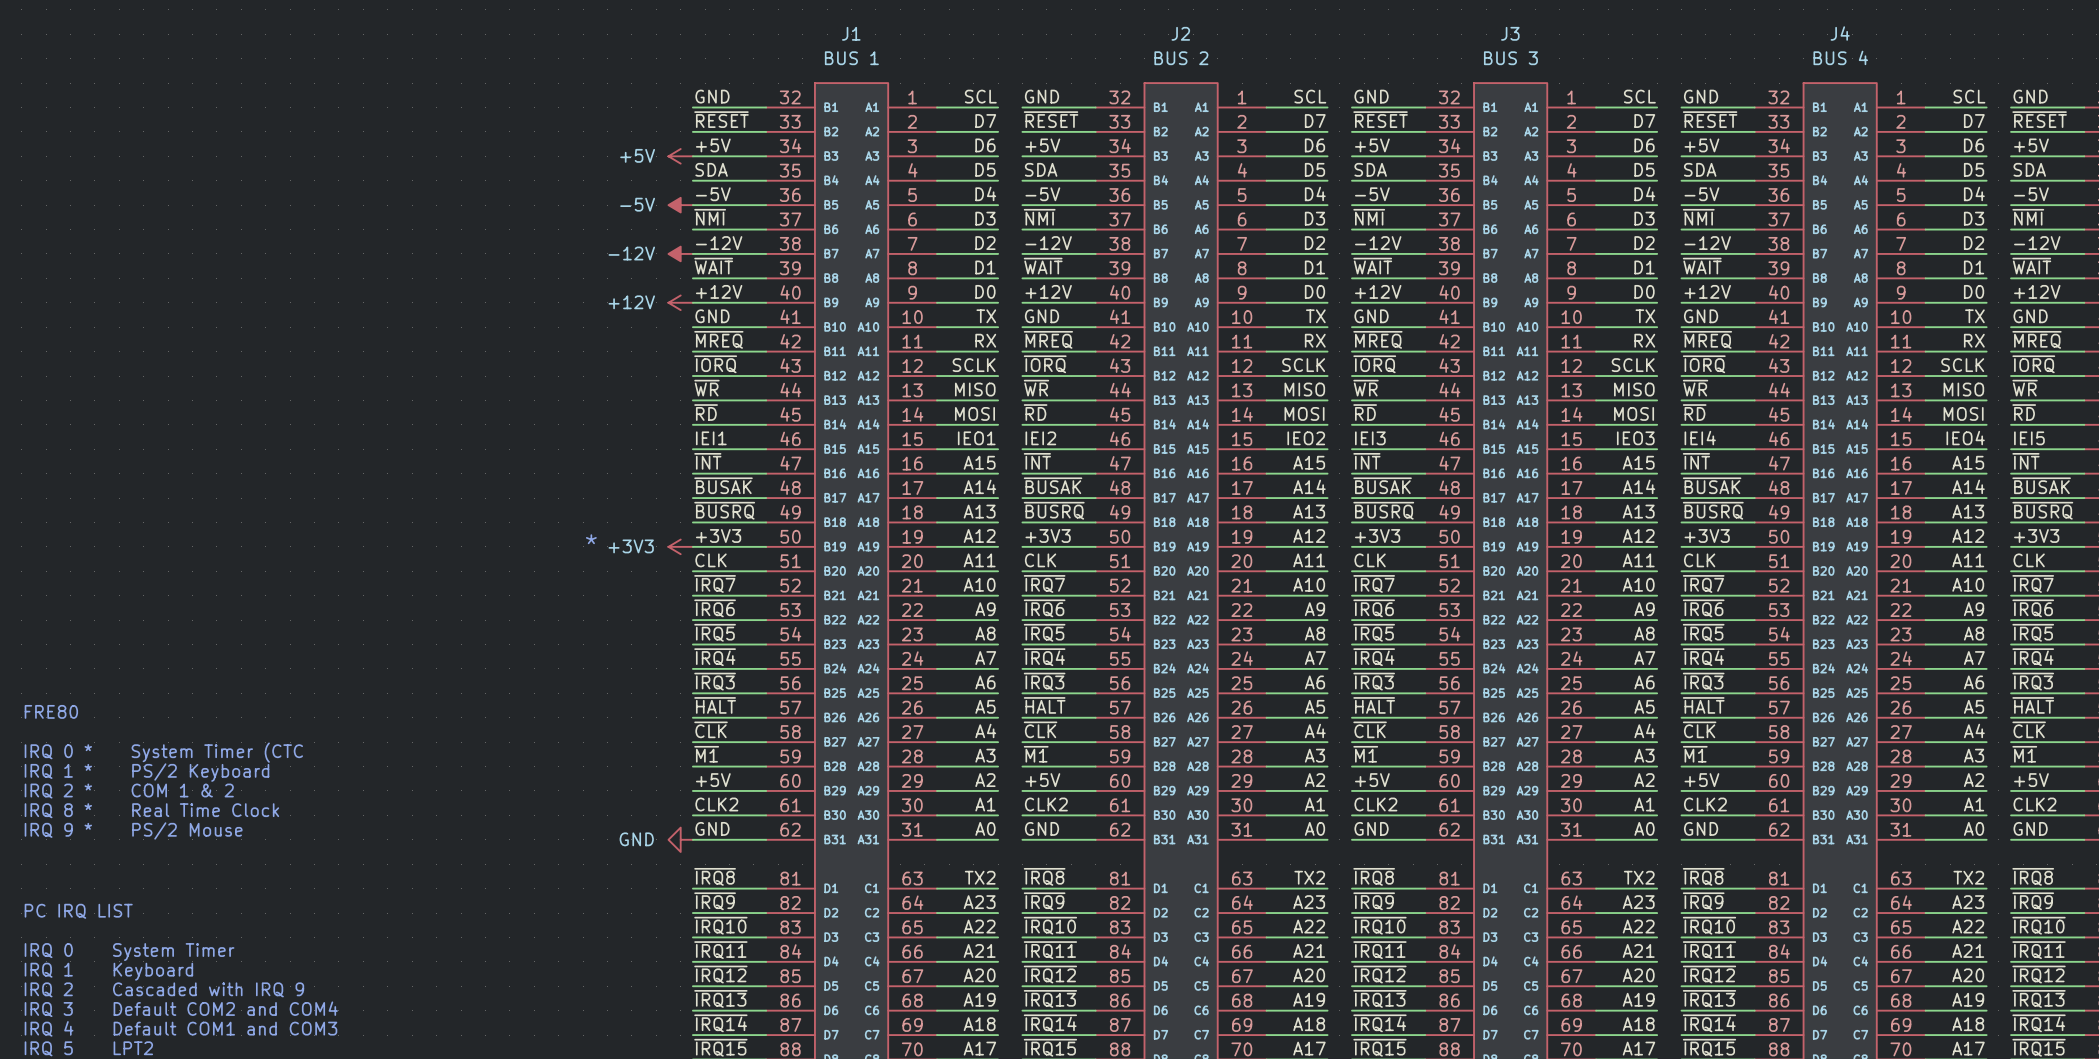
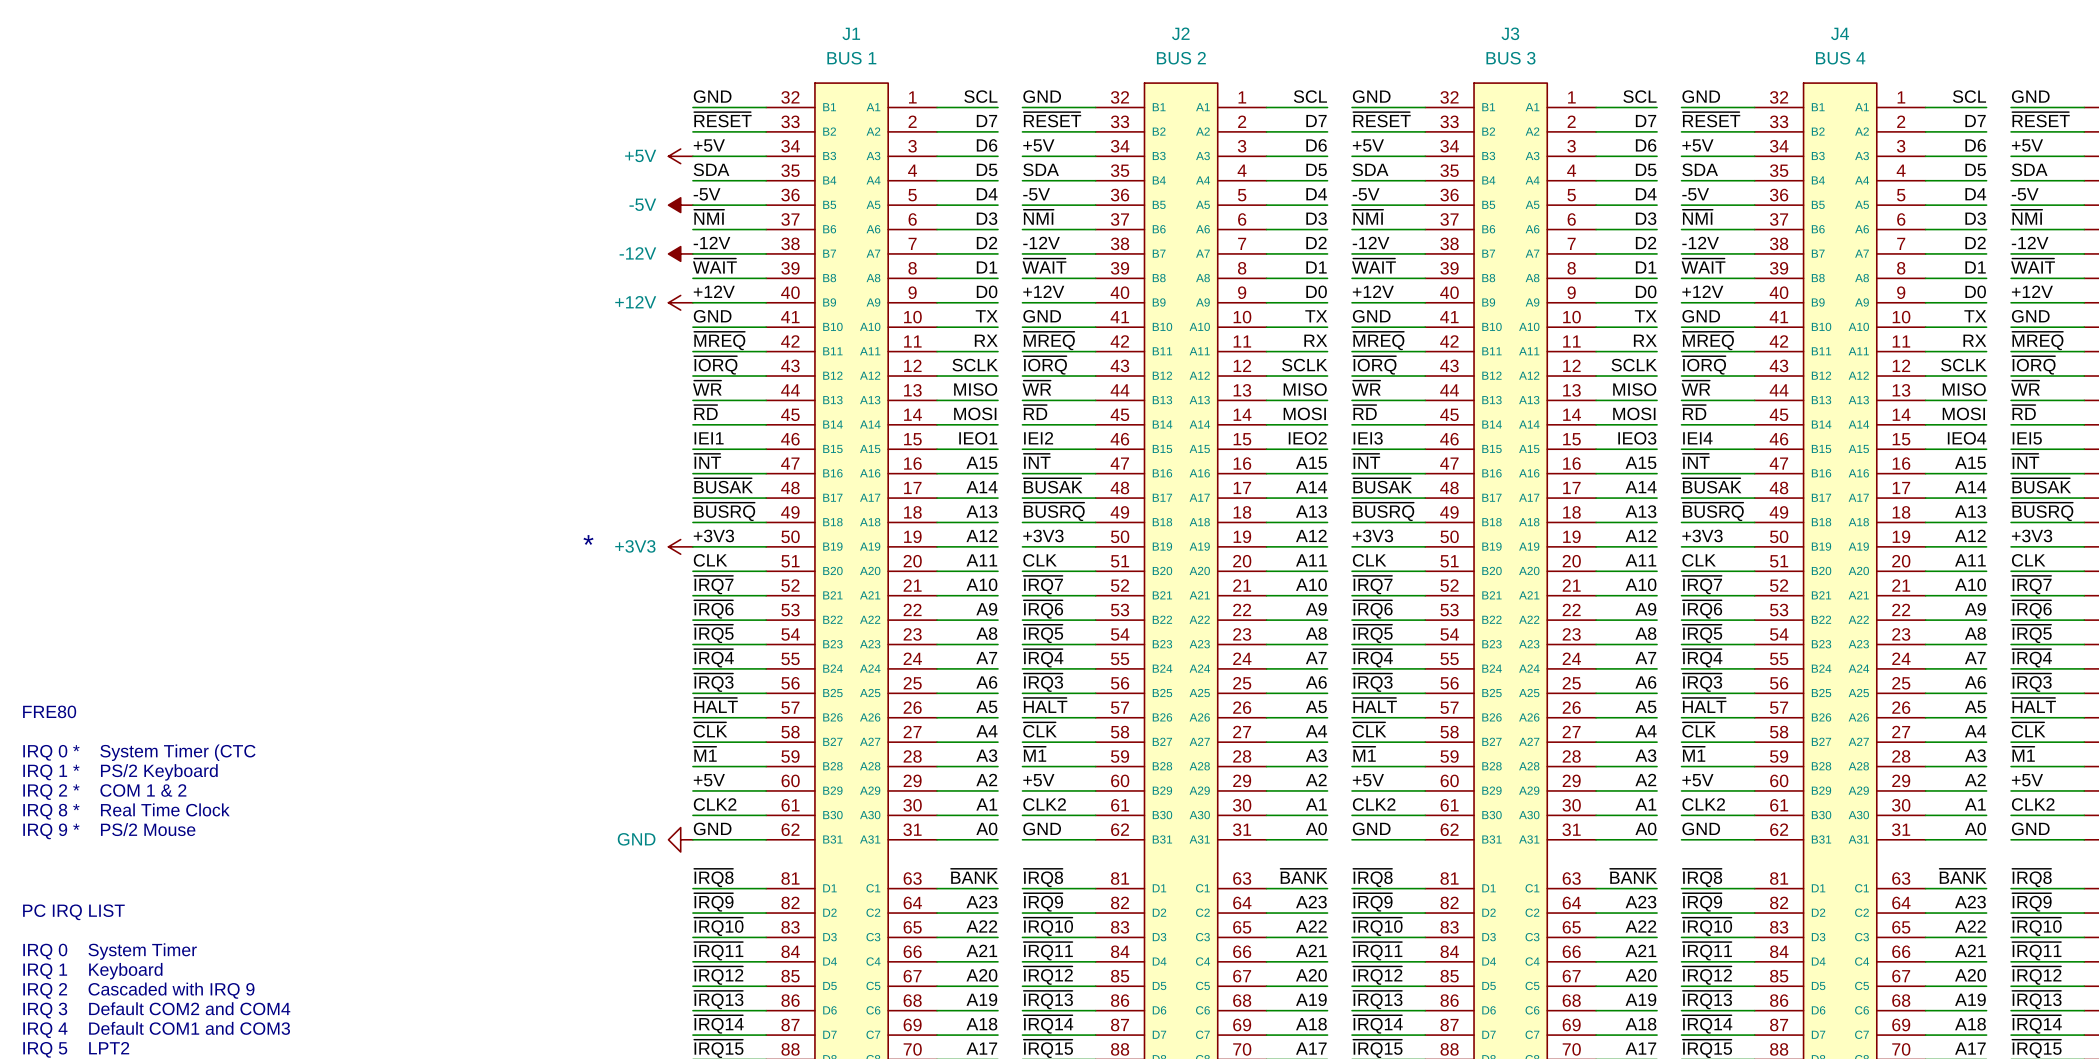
label: TX2 (980, 877) -> ~{BANK} (974, 876)
label: TX2 (1309, 877) -> ~{BANK} (1303, 876)
label: TX2 (1639, 877) -> ~{BANK} (1633, 876)
label: TX2 (1968, 877) -> ~{BANK} (1962, 876)

